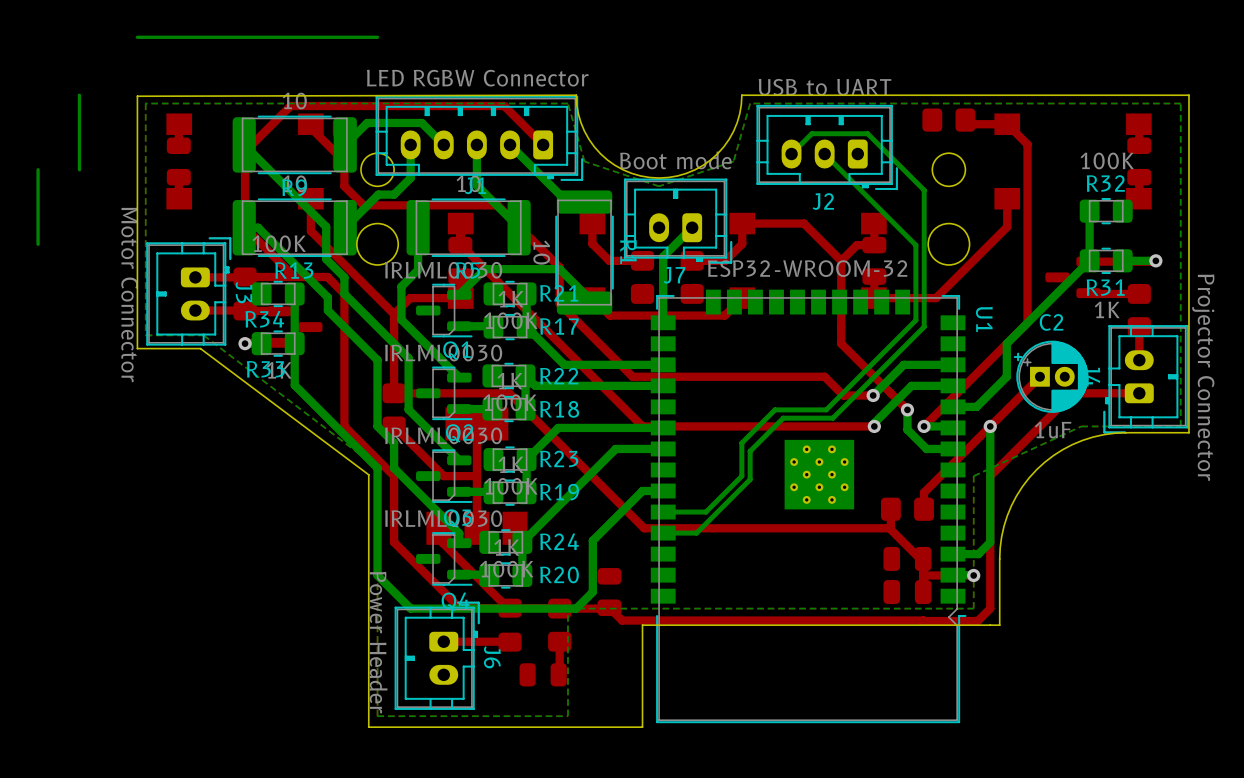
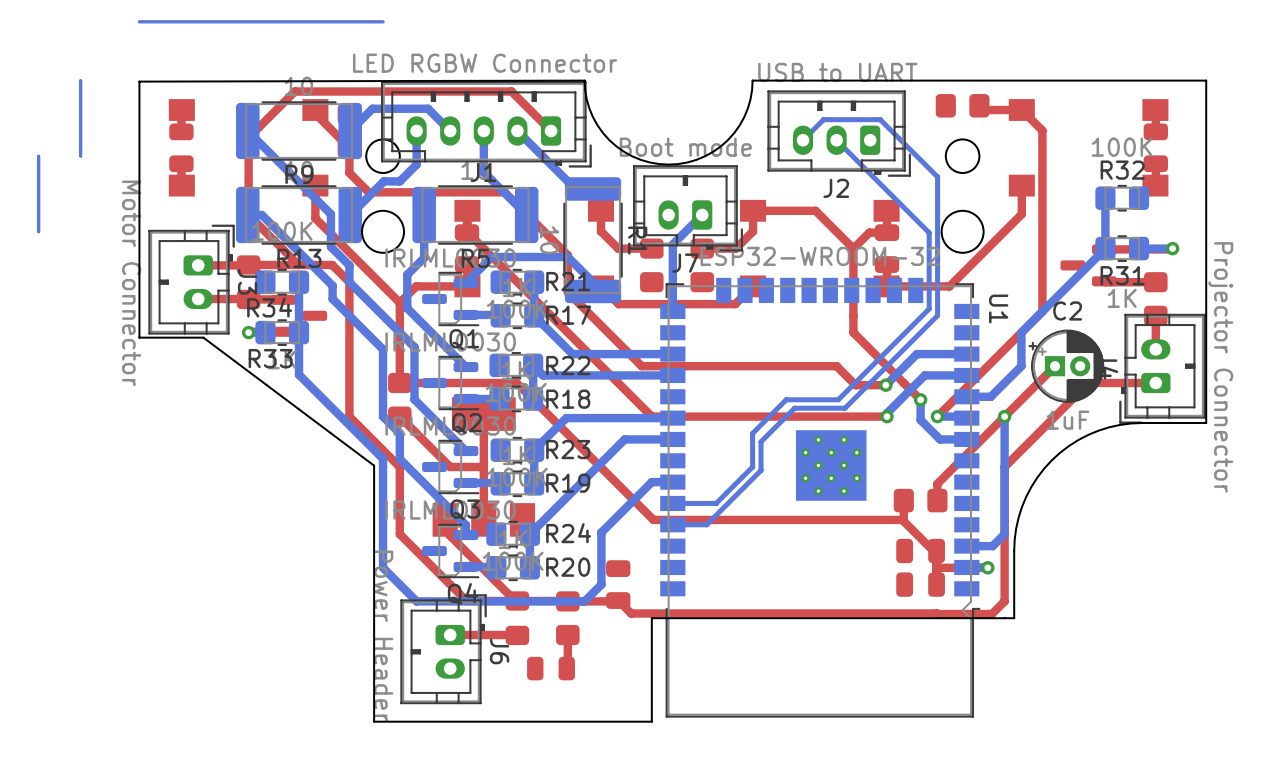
bottom zone outline: (1180, 103) (750, 103) (733, 161) (659, 186) (584, 161) (567, 103) (145, 103) (145, 335) (203, 335) (377, 467) (377, 716) (567, 716) (567, 608) (973, 608) (973, 476) (1081, 426) (1180, 426) (1180, 103) -> none

